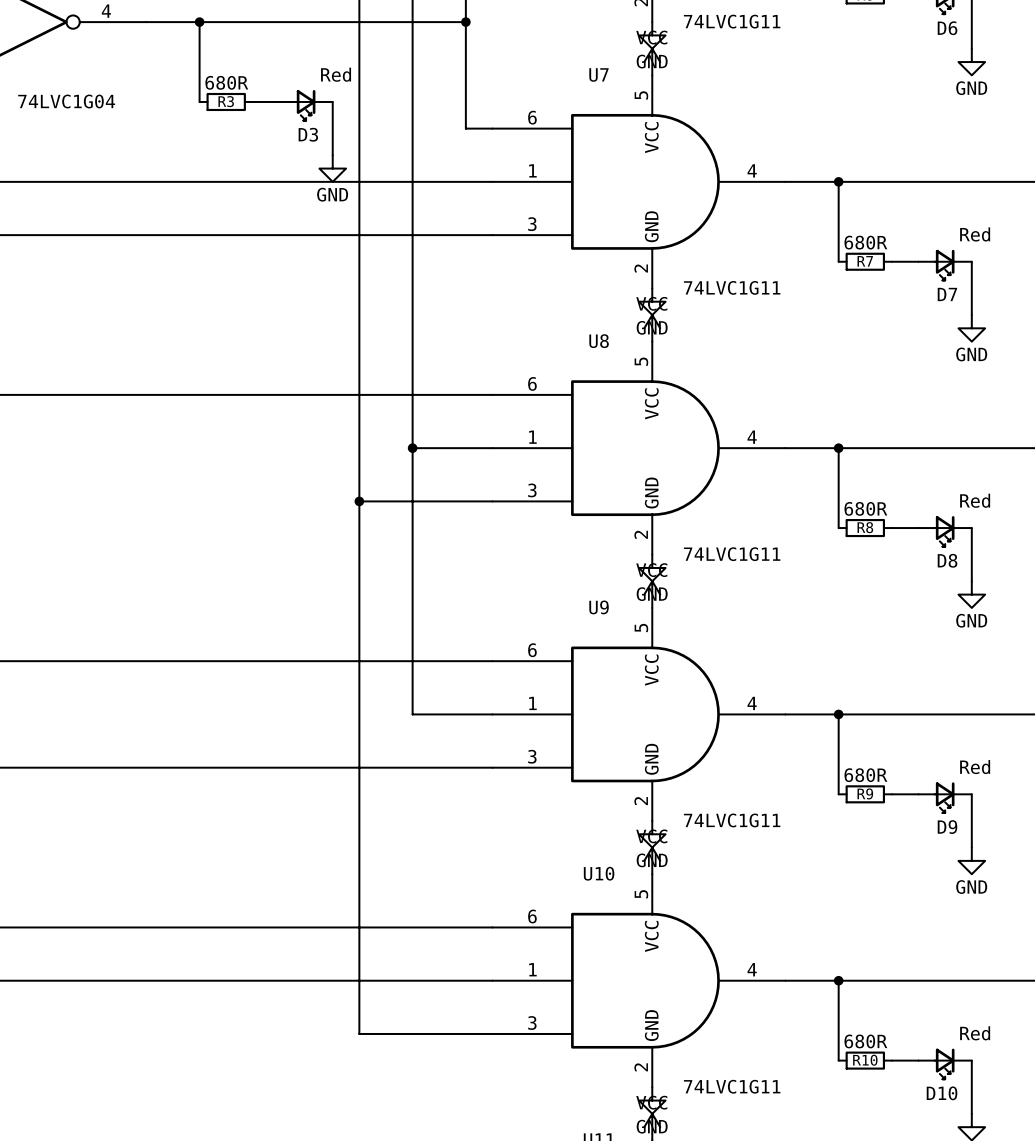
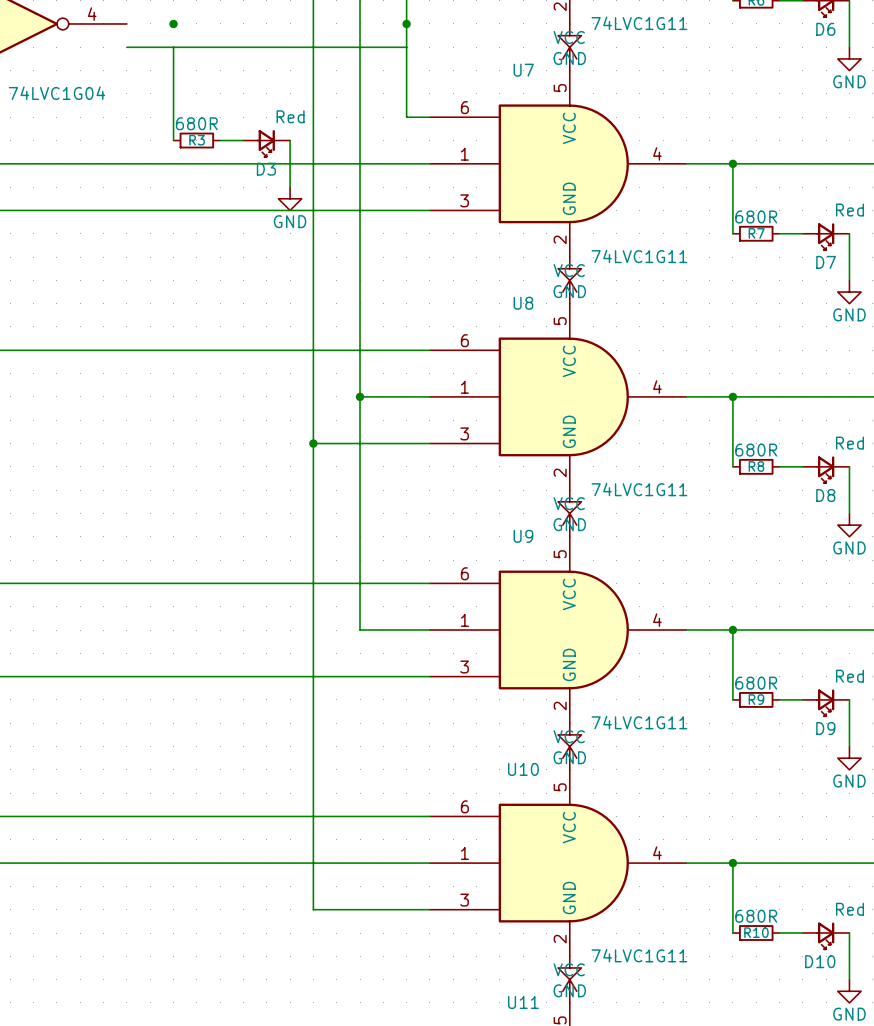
wire: (146, 22) (465, 22) -> (126, 47) (406, 47)
wire: (199, 22) (199, 48) -> none
wire: none -> (173, 93) (173, 140)
R3 position: (226, 101) -> (196, 140)
wire: (252, 101) (279, 101) -> (220, 140) (243, 140)
wire: (332, 101) (332, 155) -> (290, 187) (290, 140)
D3 position: (306, 105) -> (266, 143)
power symbol position: GND (332, 168) -> GND (290, 198)

